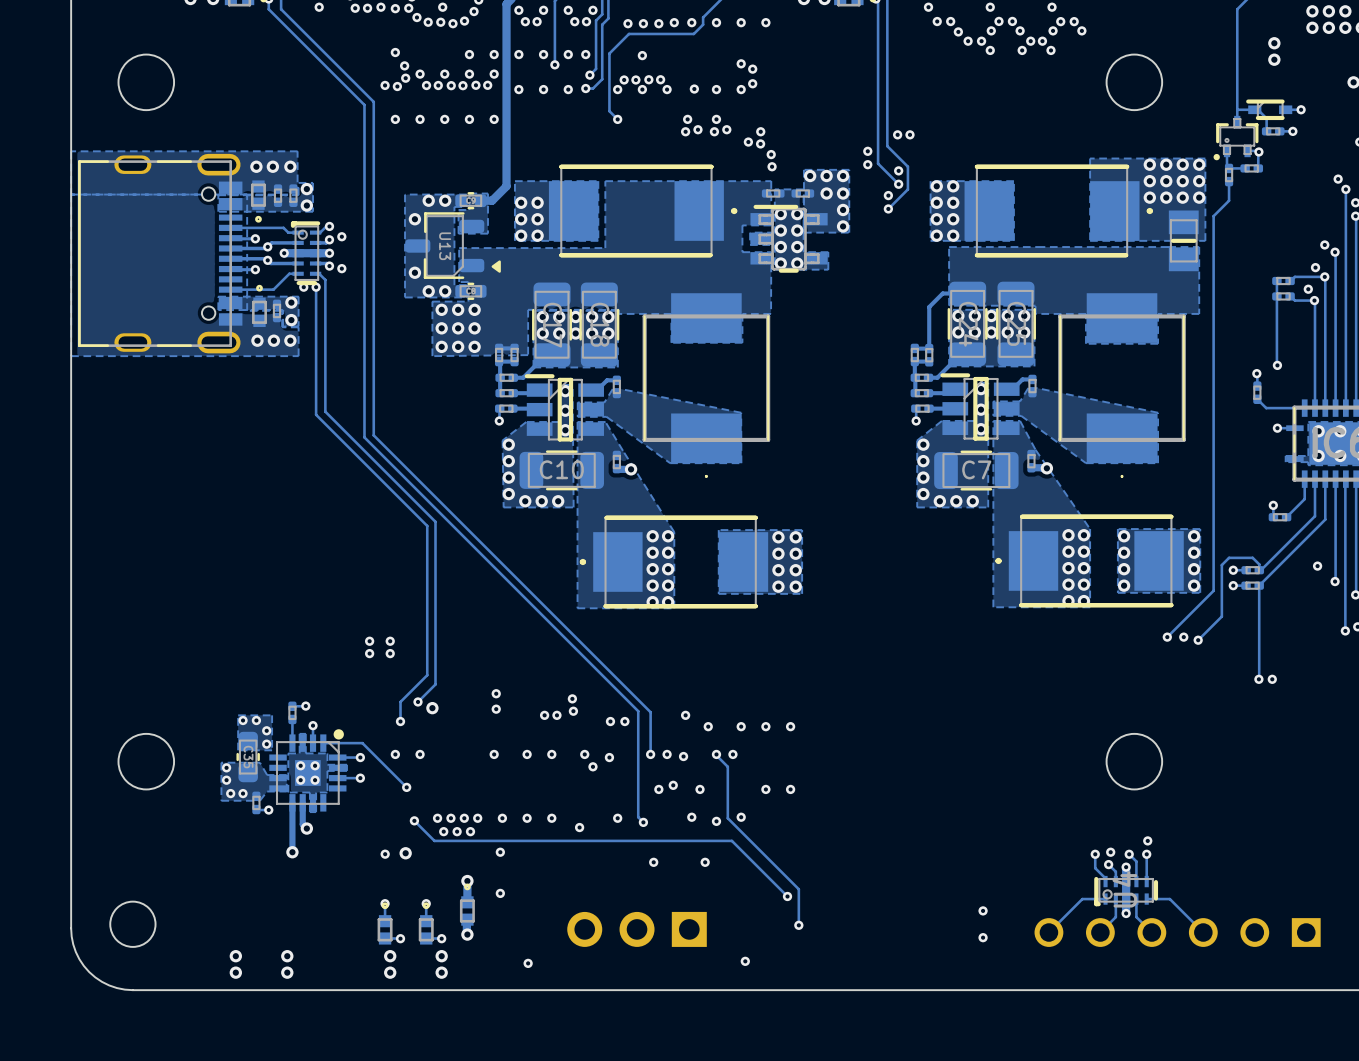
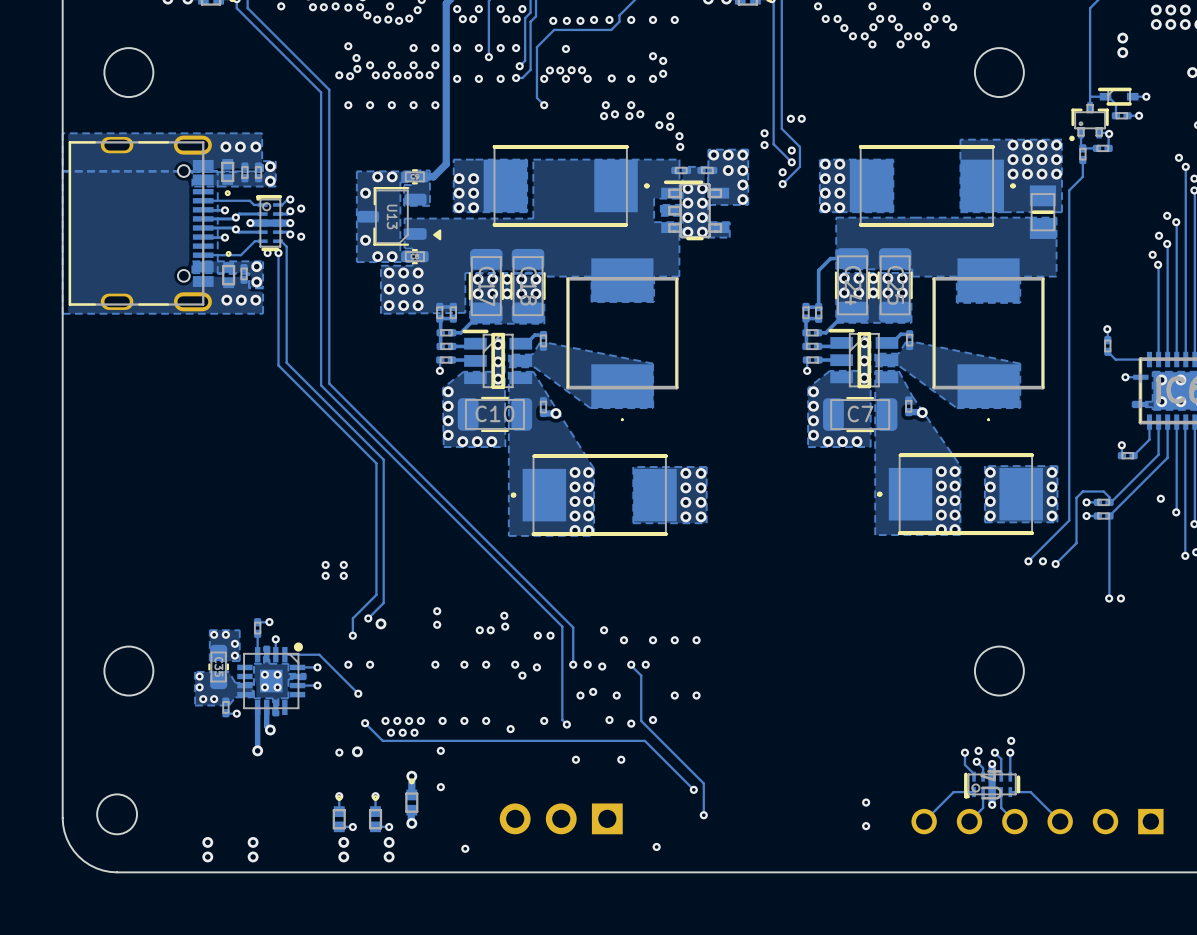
track: (1324, 276) (1294, 276) (1290, 281) -> none
track: (1276, 281) (1277, 365) -> none
part: (1283, 281) -> none
part: (1283, 296) -> none
track: (1290, 296) (1294, 300) (1313, 301) -> none
via: (1277, 365) -> none

